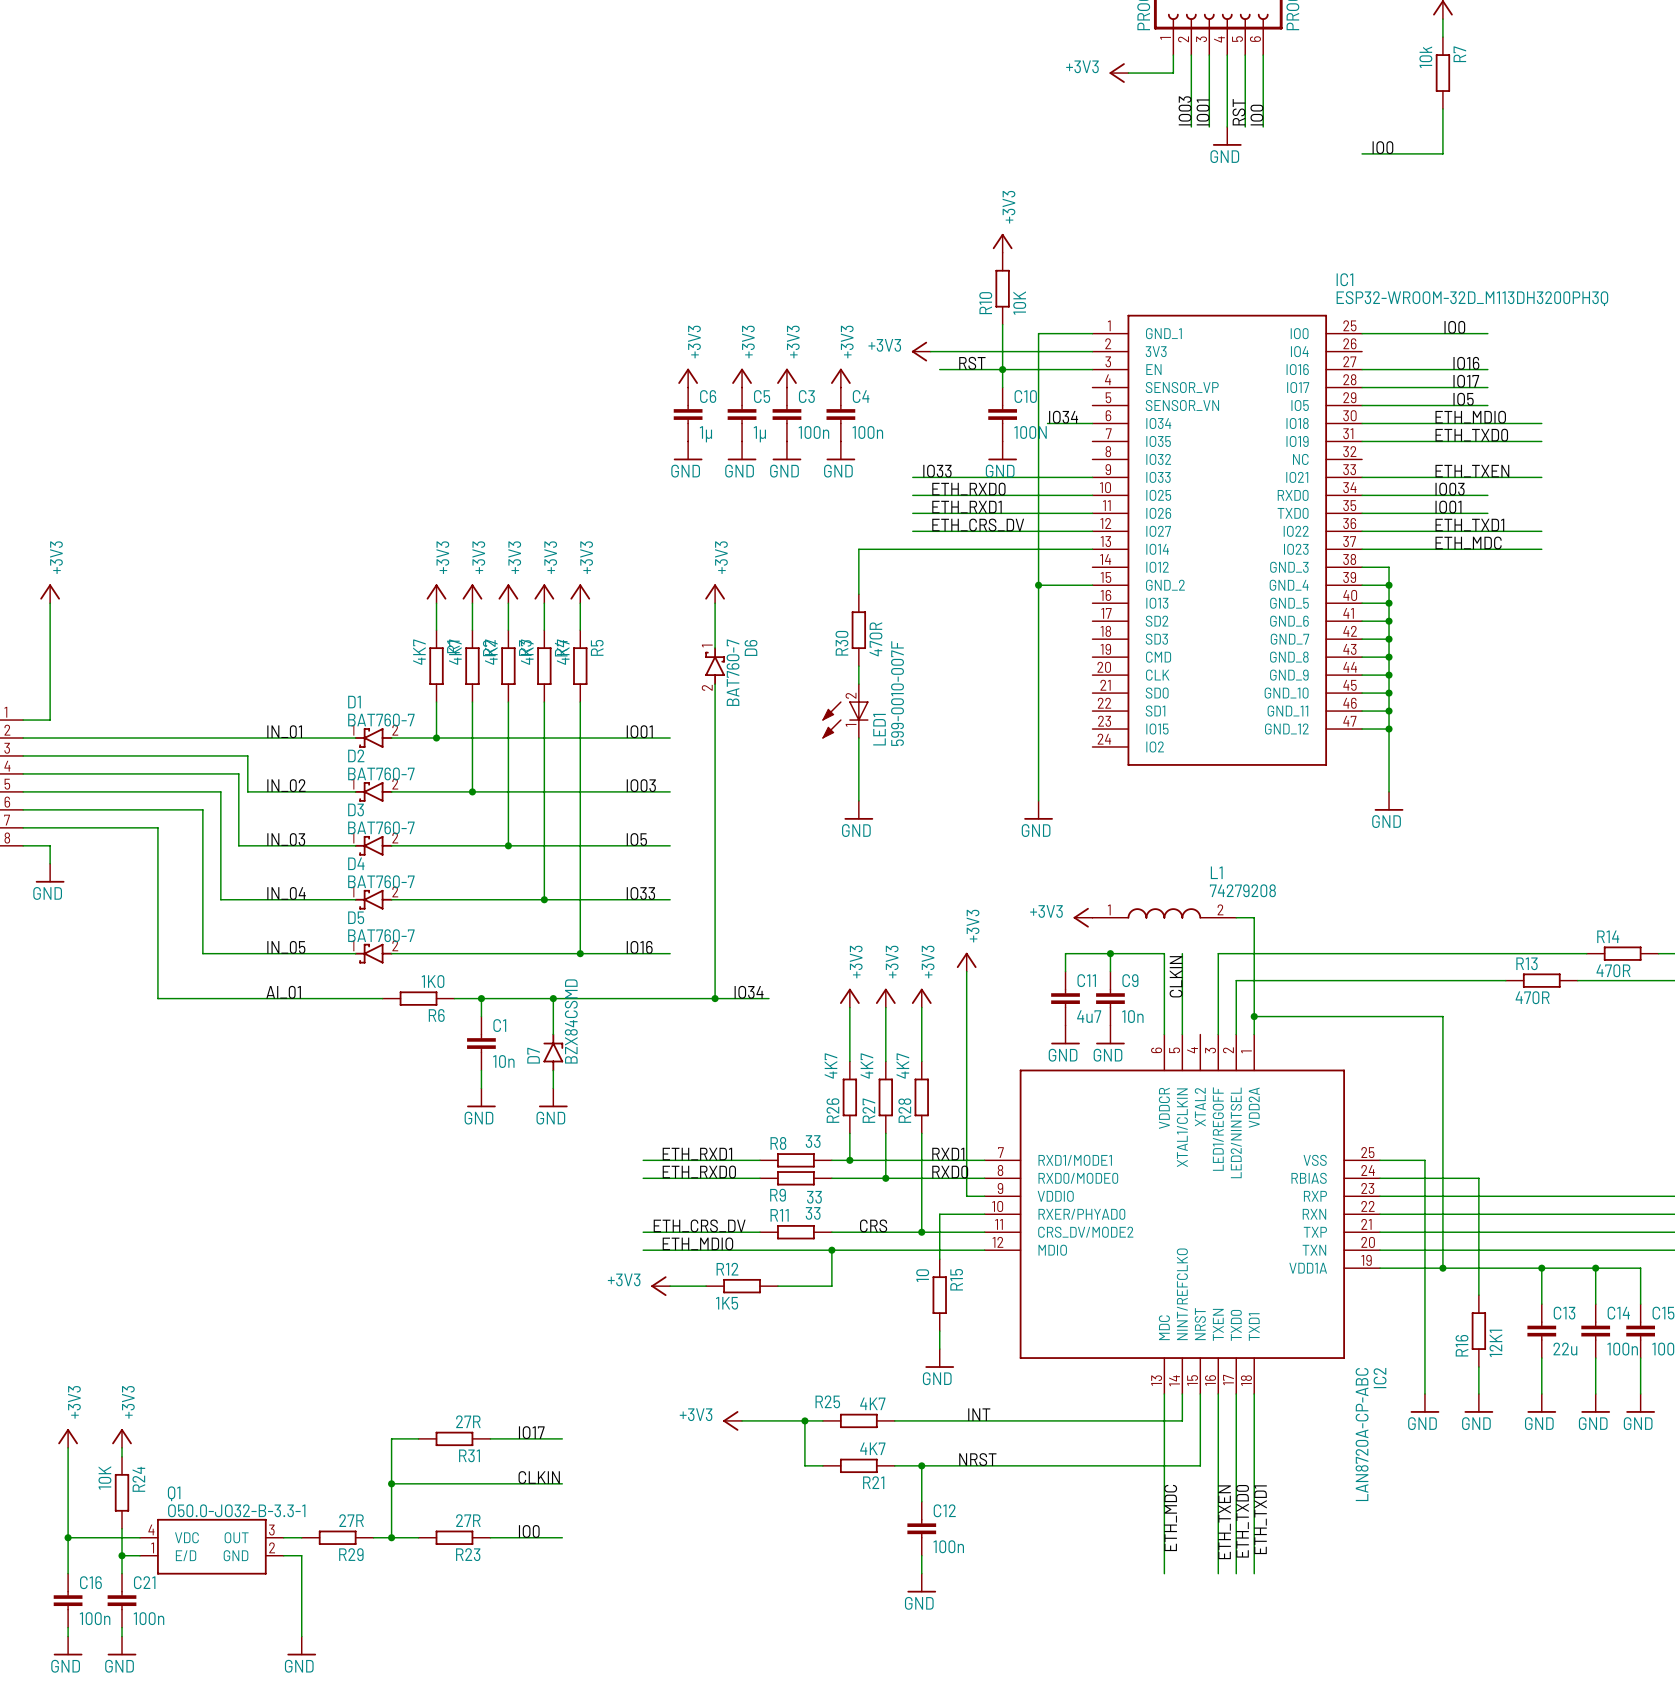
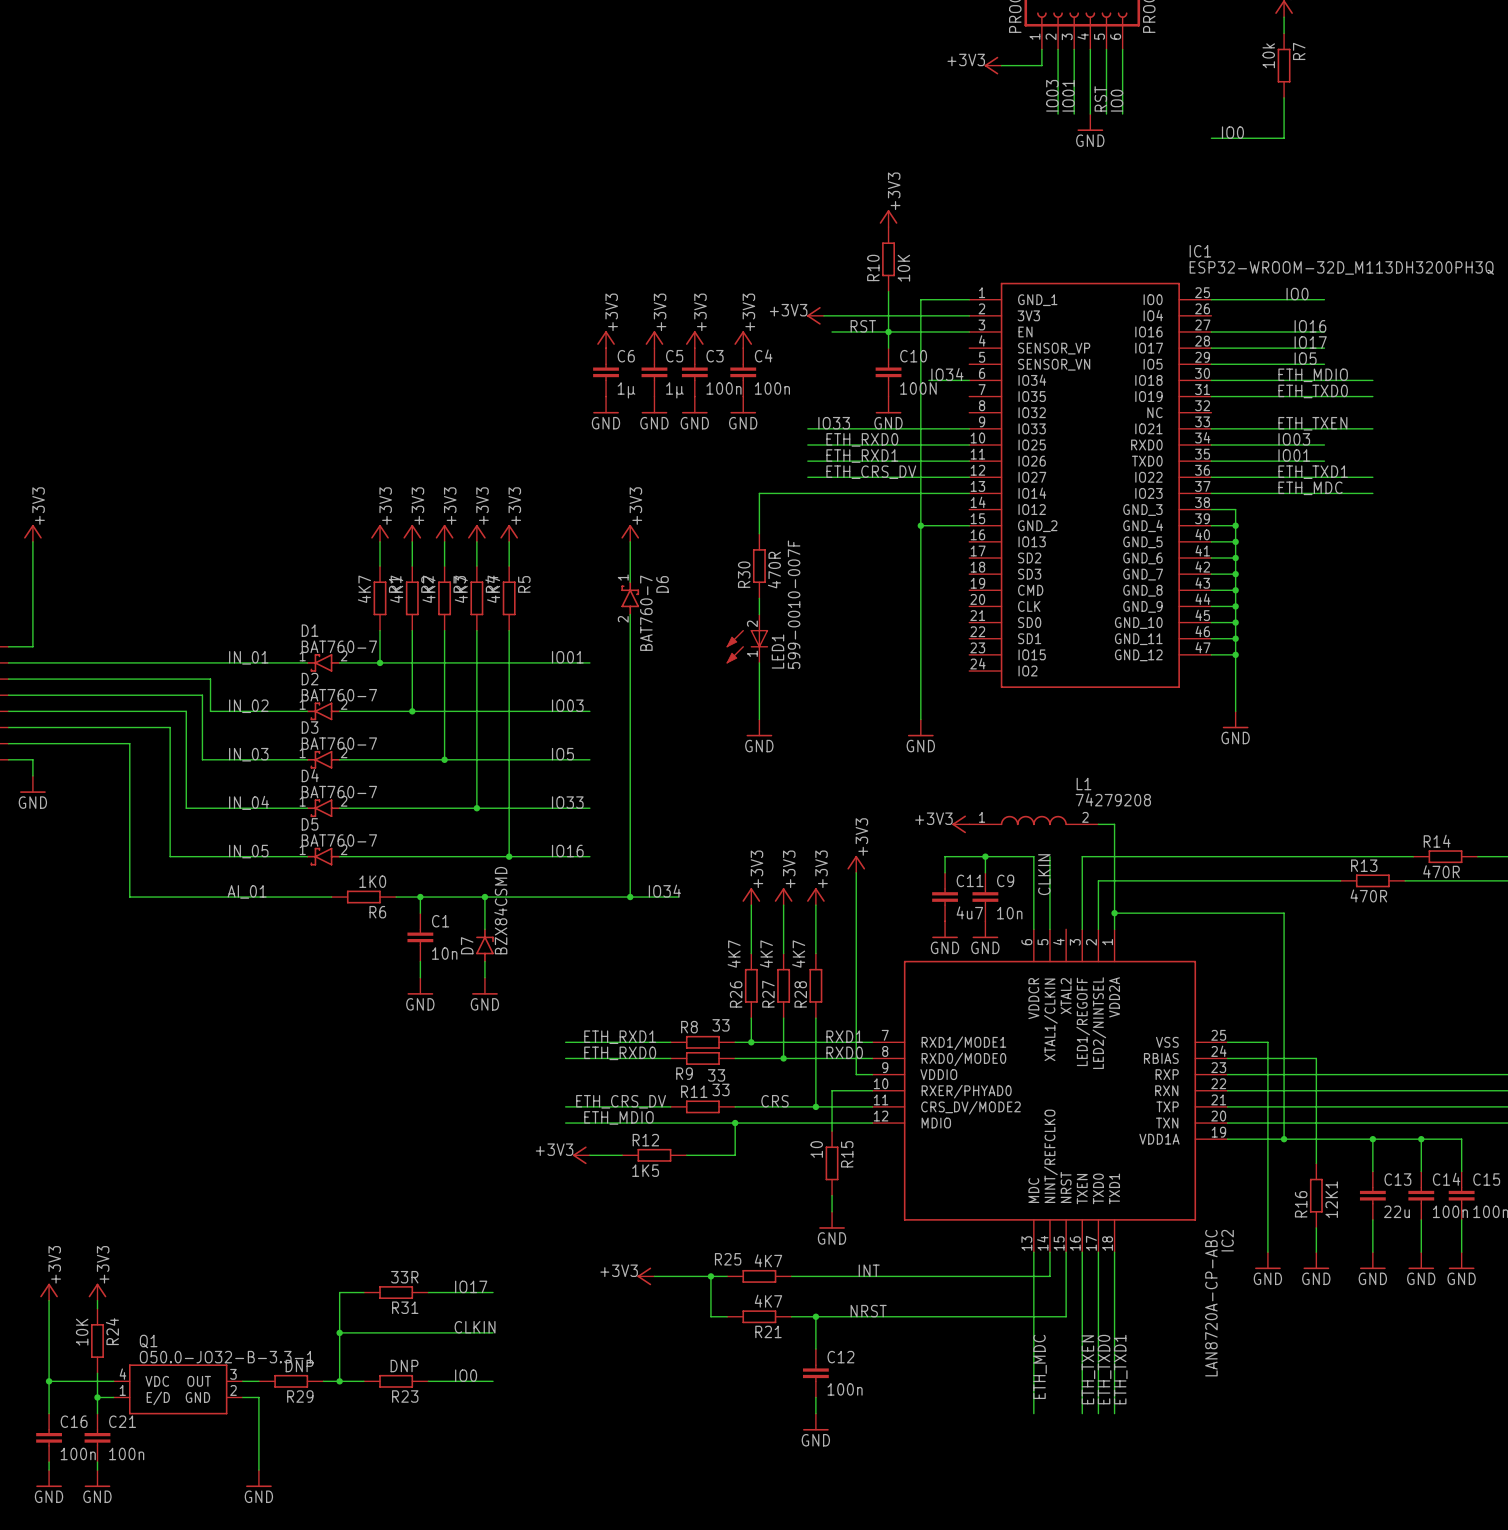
R31 value: 27R (468, 1421) -> 33R (404, 1277)
R29 value: 27R (351, 1520) -> DNP (299, 1366)
R23 value: 27R (468, 1520) -> DNP (404, 1366)

